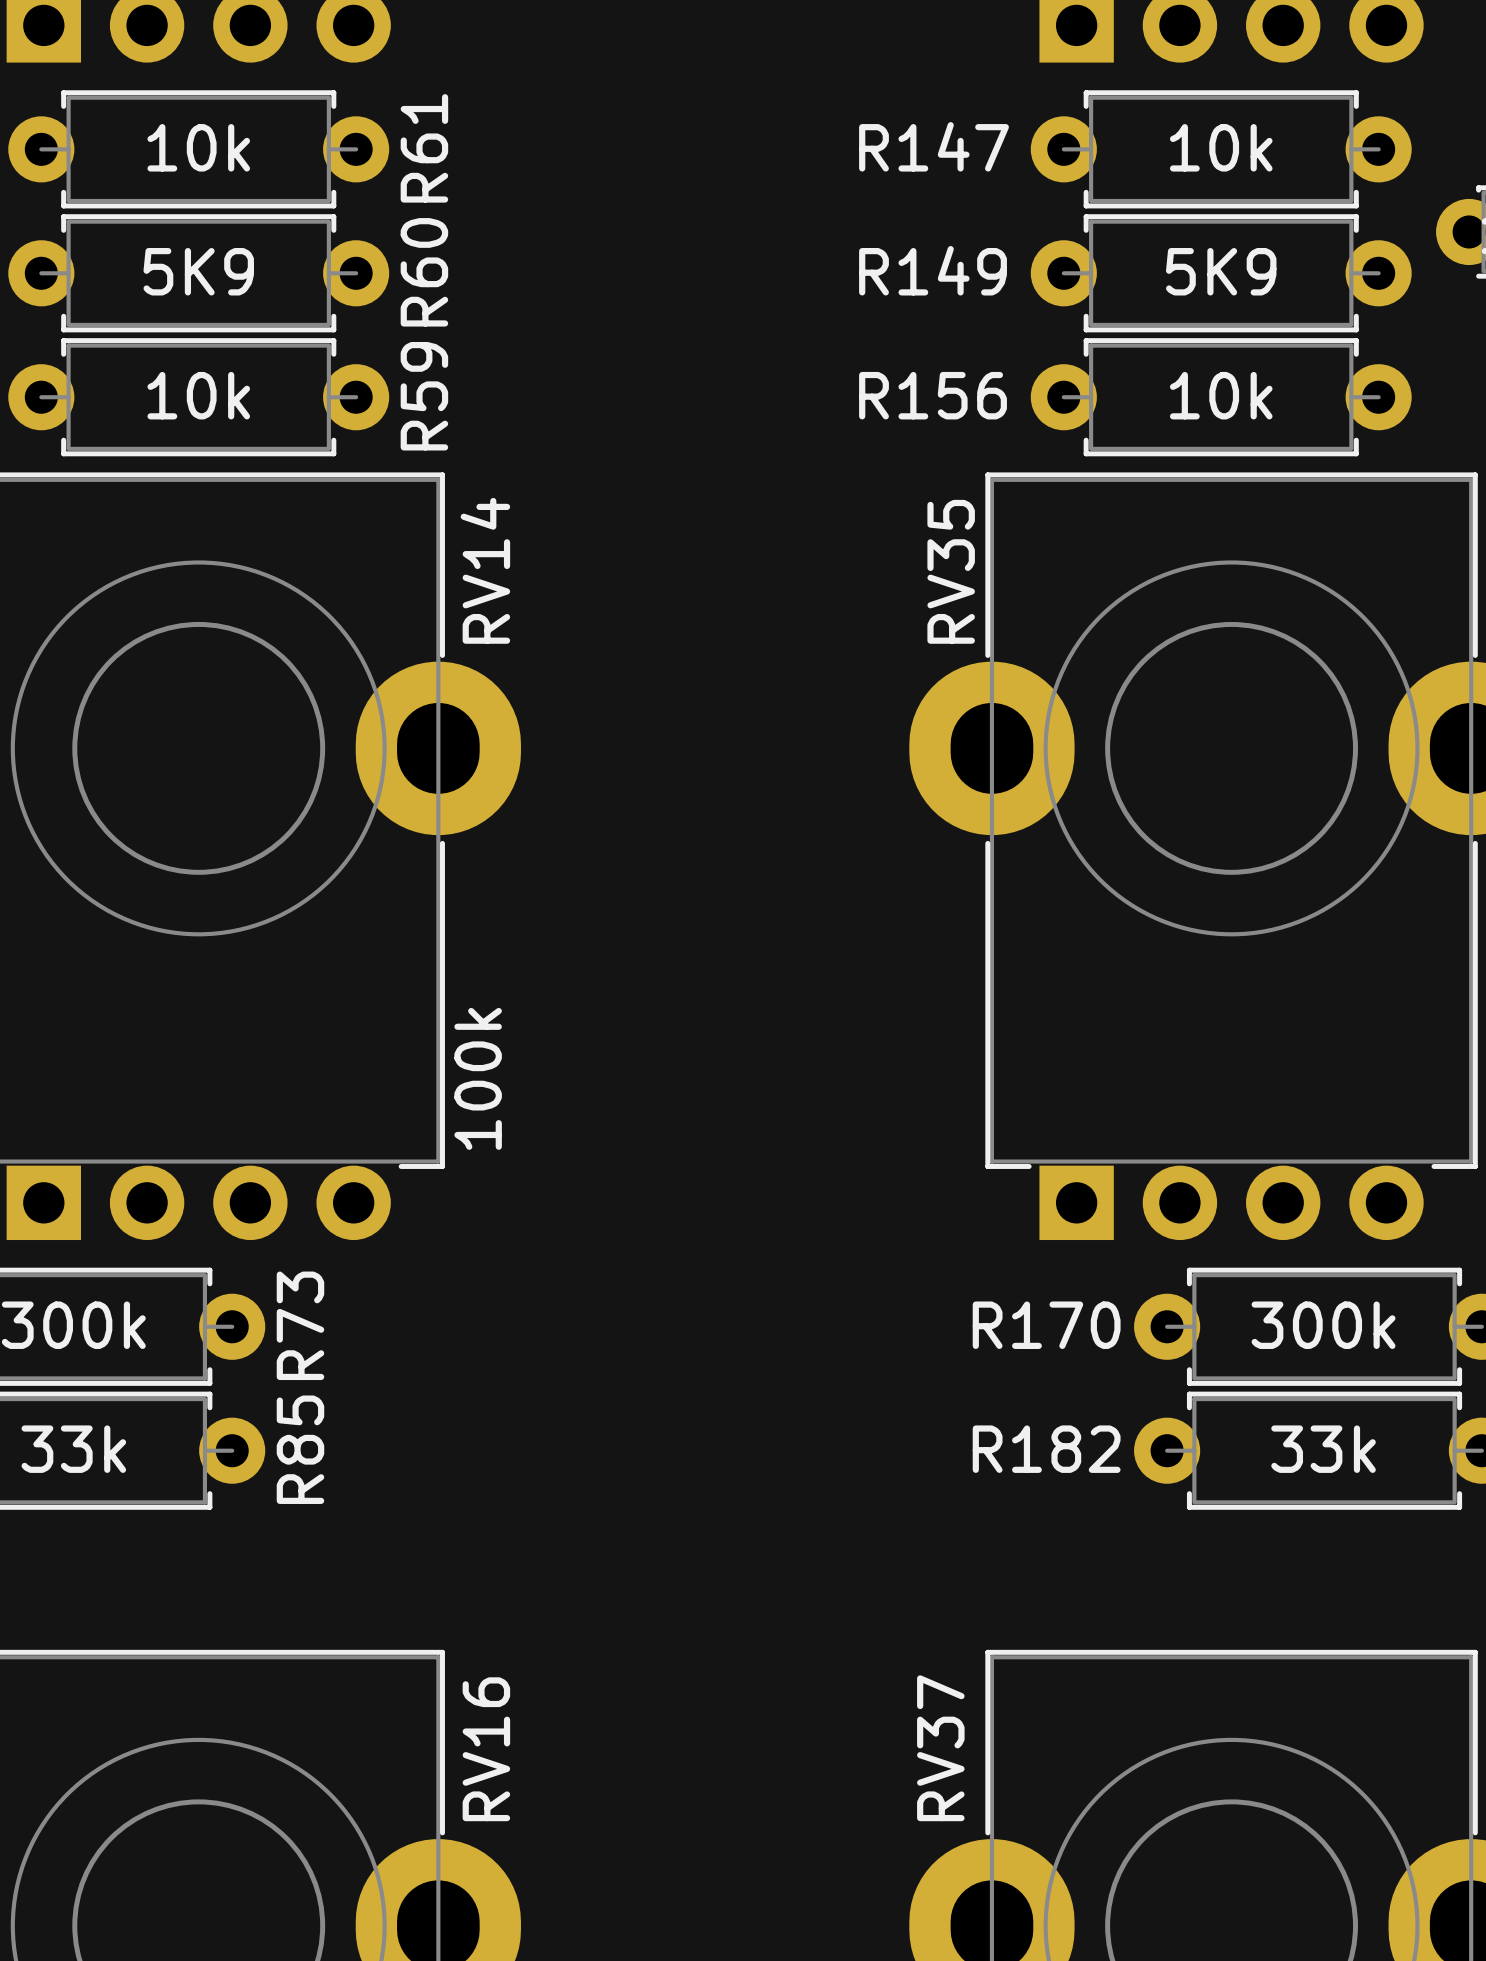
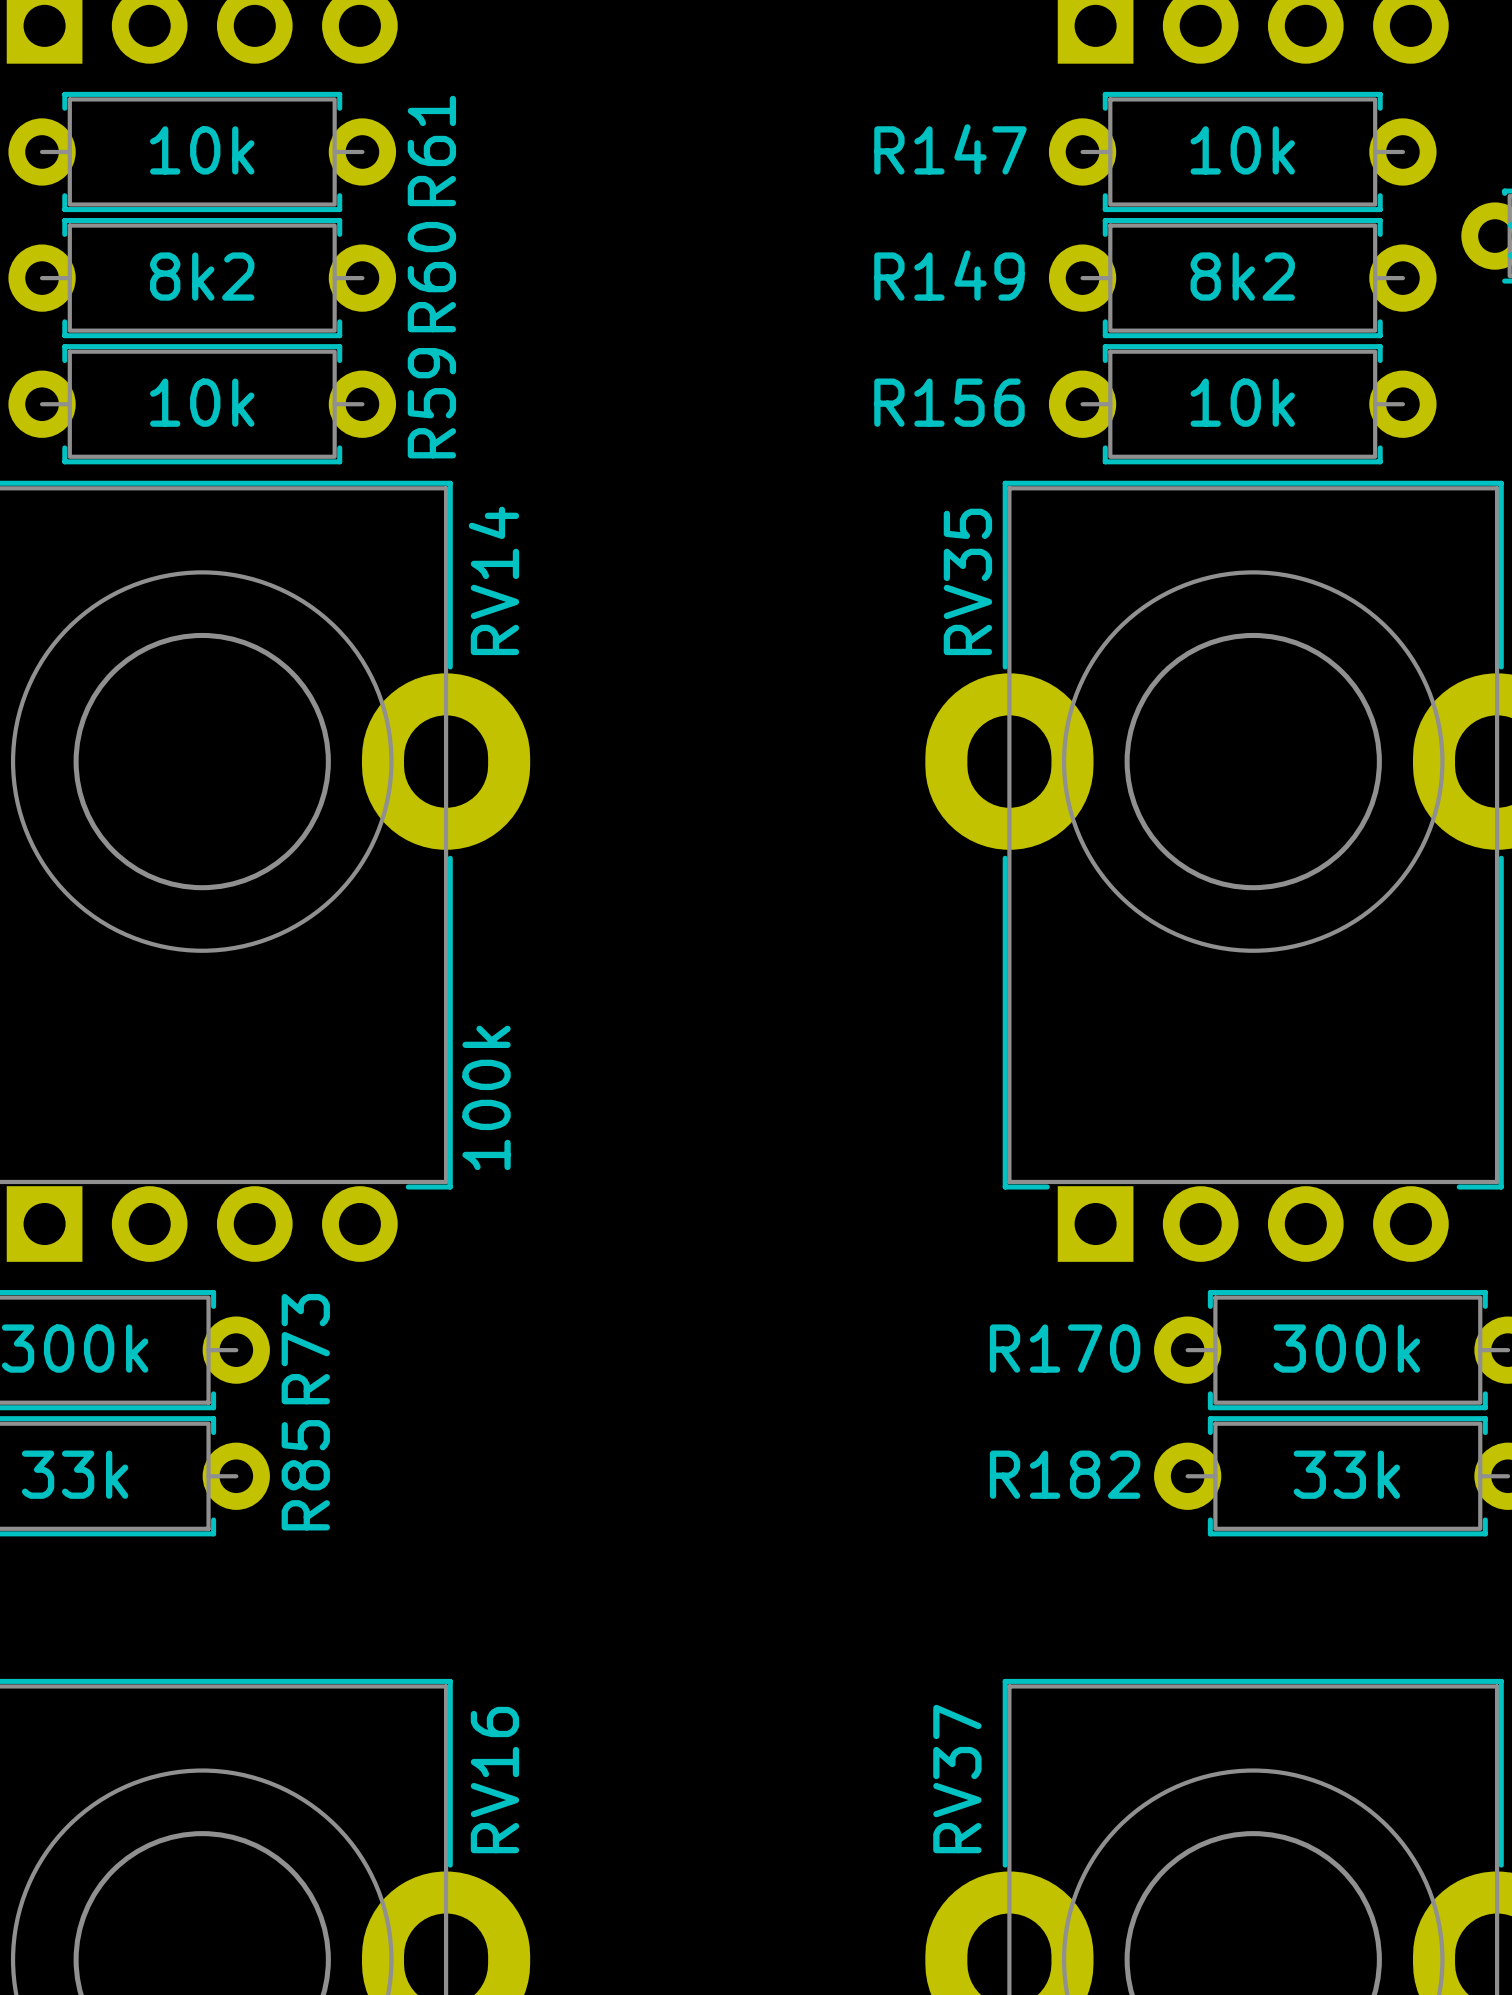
R60 value: 5K9 (198, 271) -> 8k2 (202, 276)
R149 value: 5K9 (1221, 271) -> 8k2 (1242, 276)

